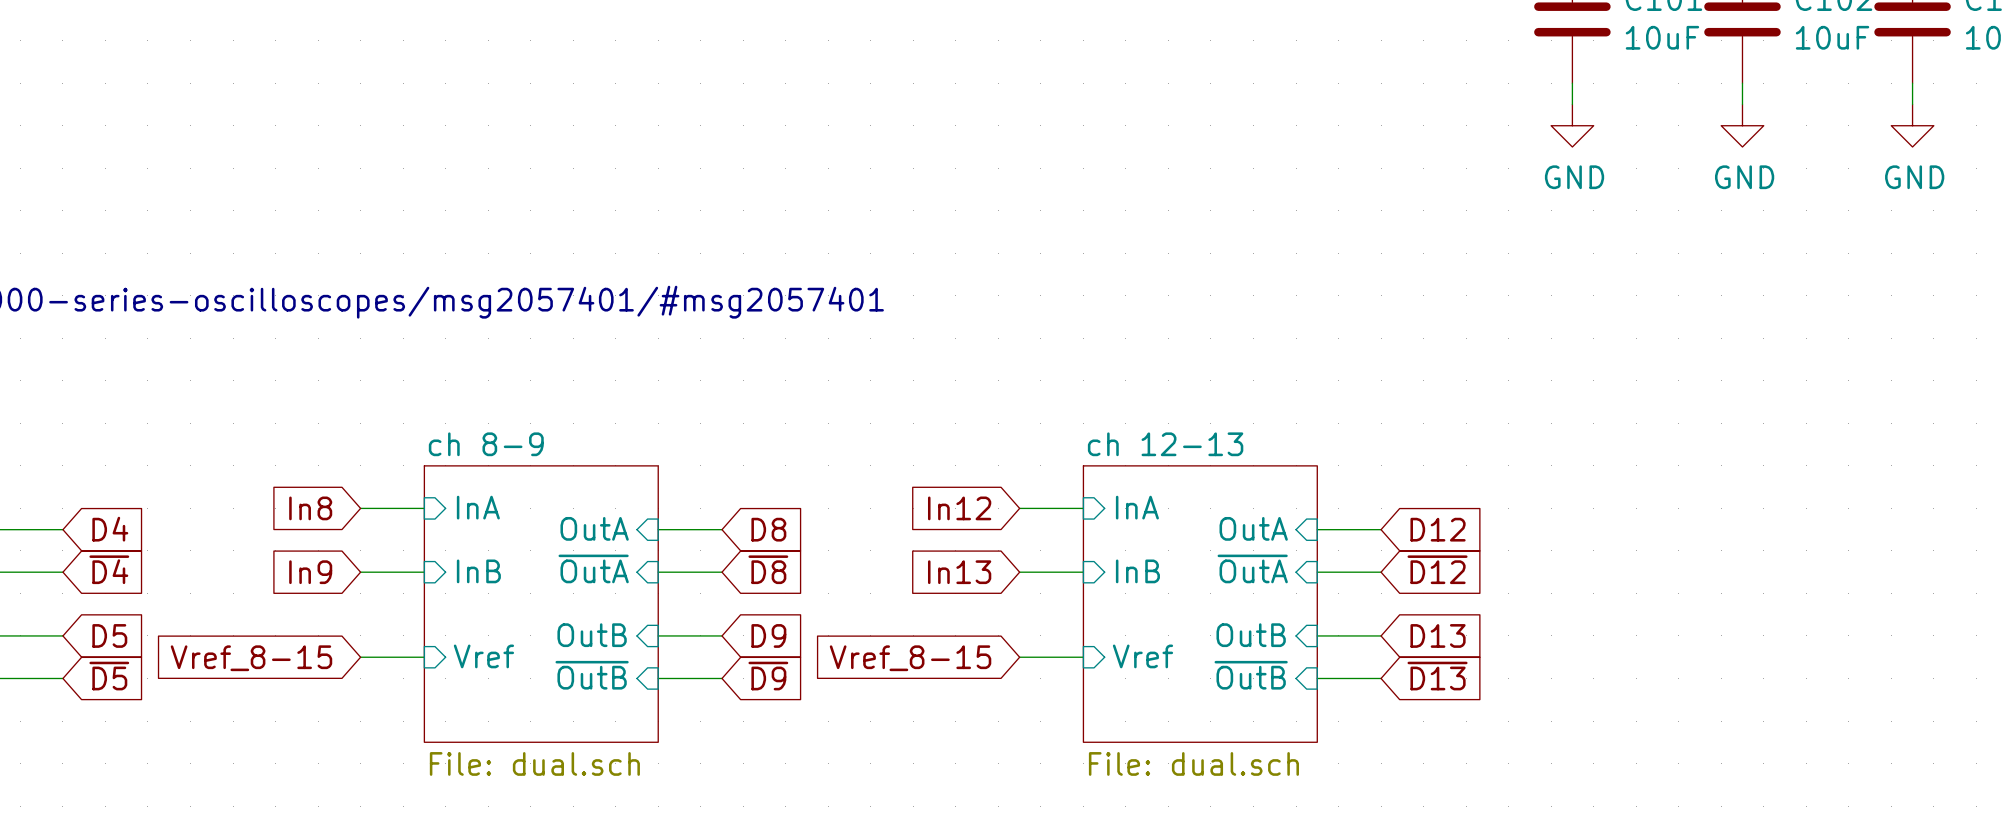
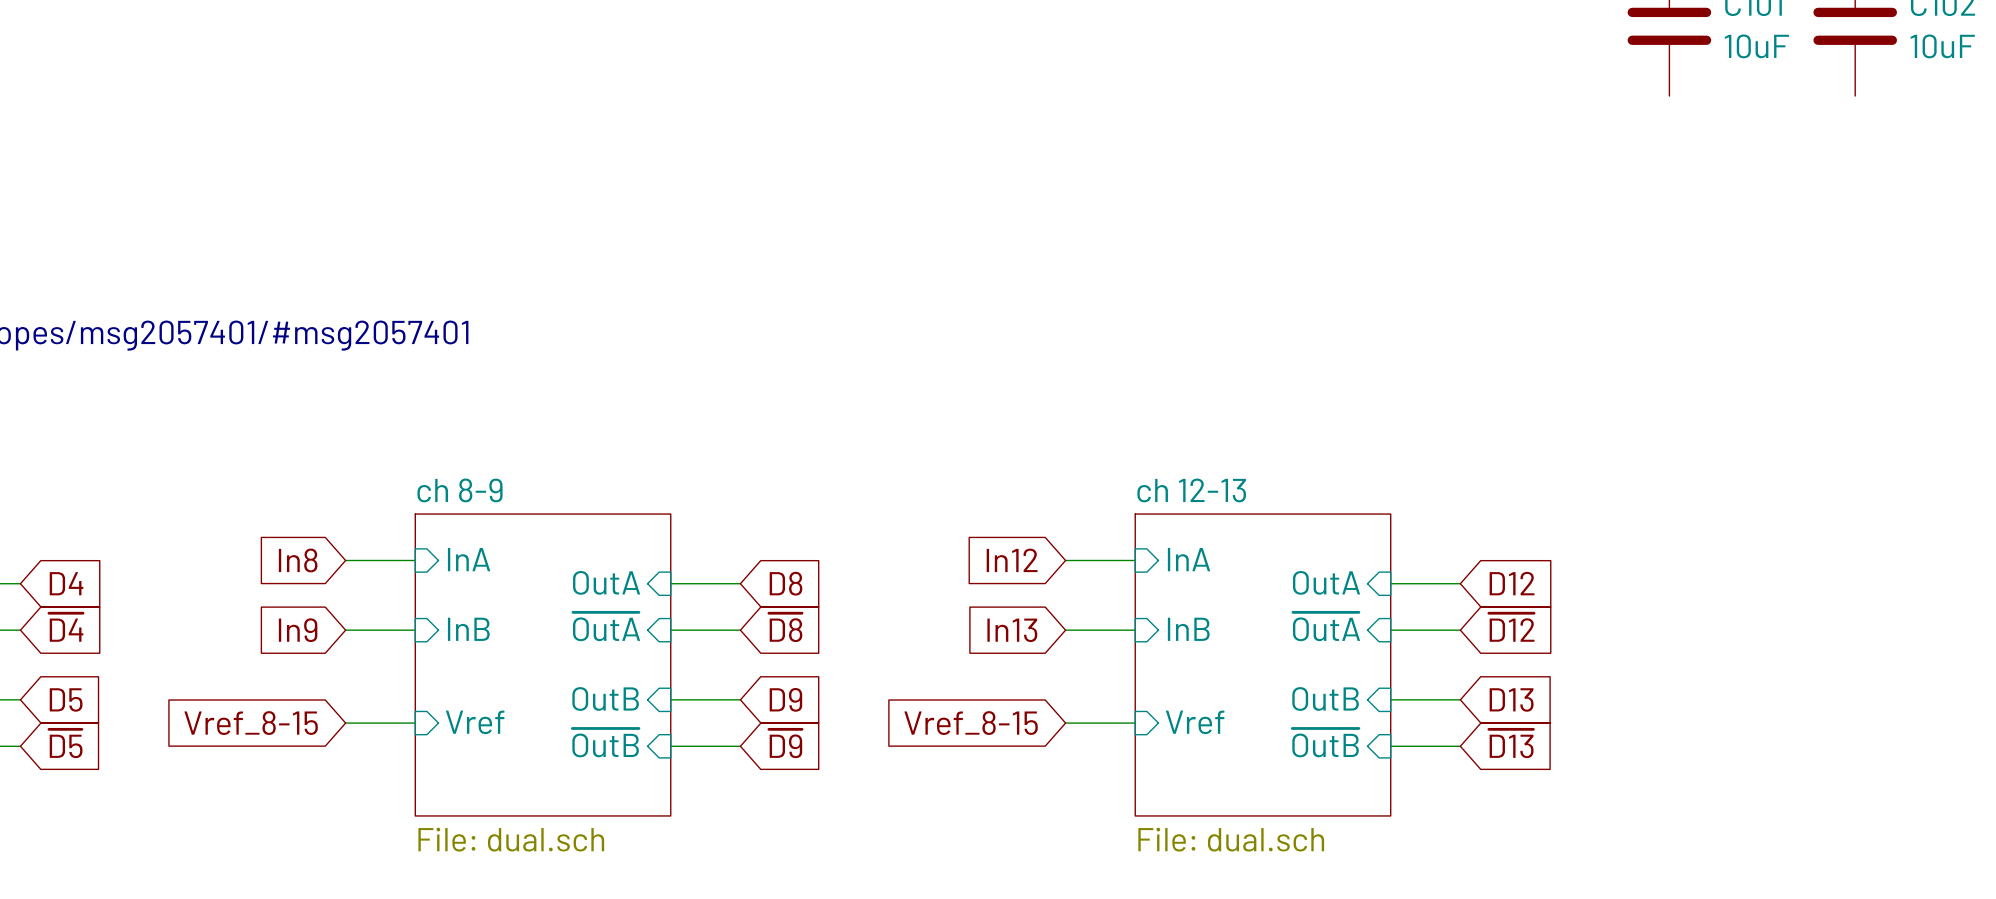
wire: (1572, 83) (1572, 104) -> none
wire: (1742, 83) (1742, 104) -> none
power symbol: GND (1572, 125) -> none
power symbol: GND (1742, 125) -> none

